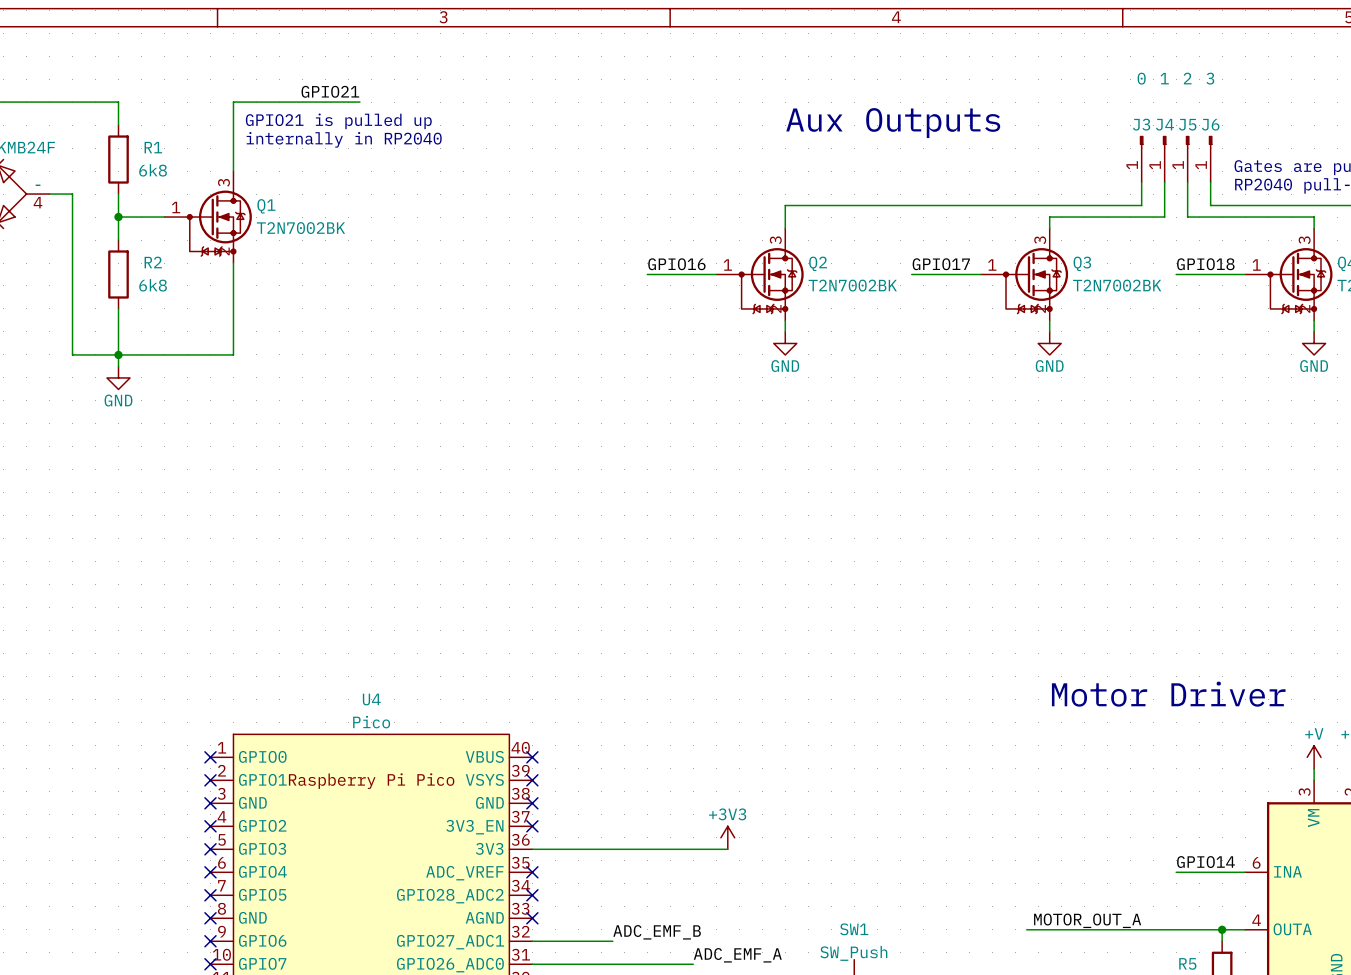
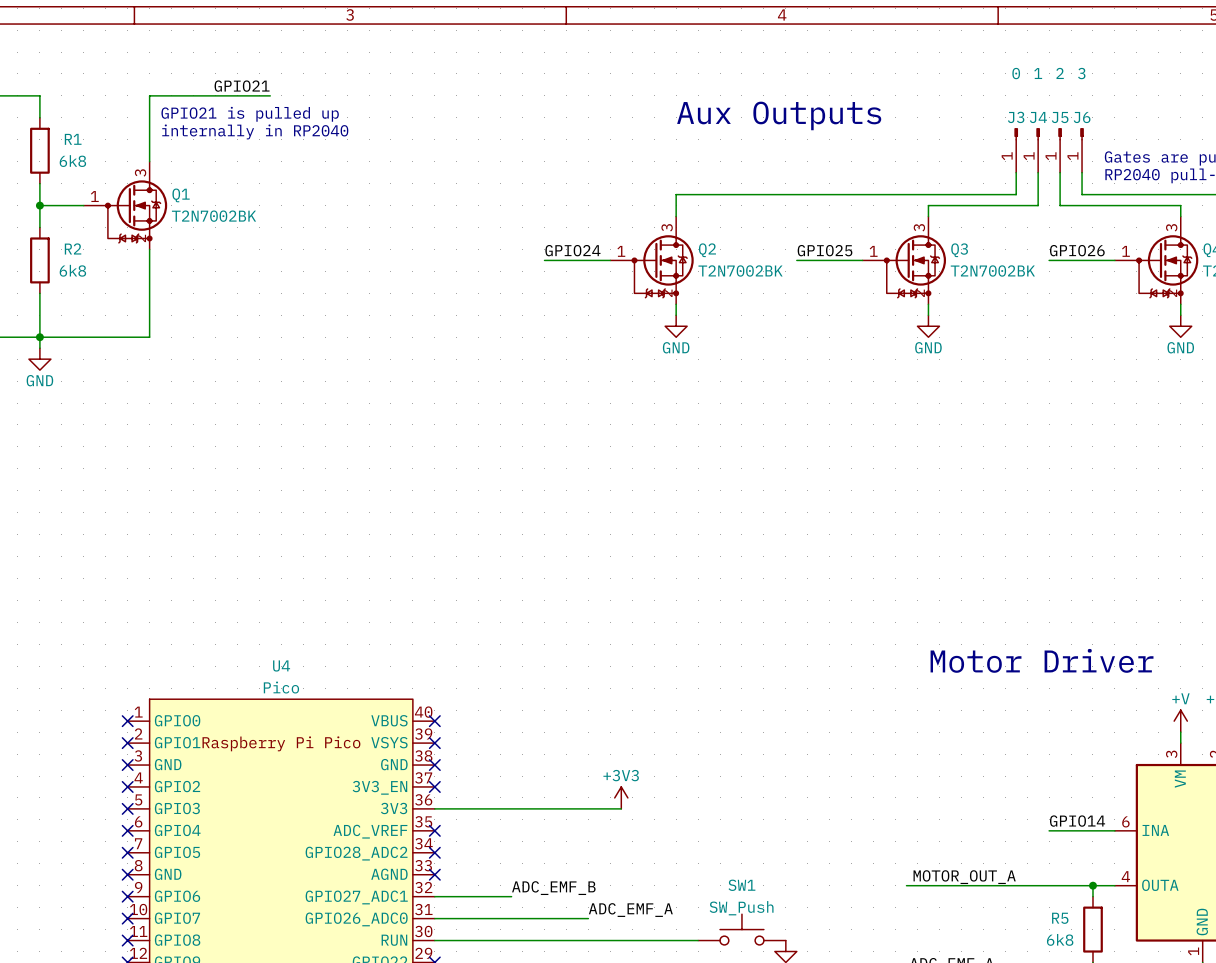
label: GPIO16 (676, 264) -> GPIO24 (572, 250)
label: GPIO17 (941, 264) -> GPIO25 (825, 250)
label: GPIO18 (1205, 264) -> GPIO26 (1077, 250)

